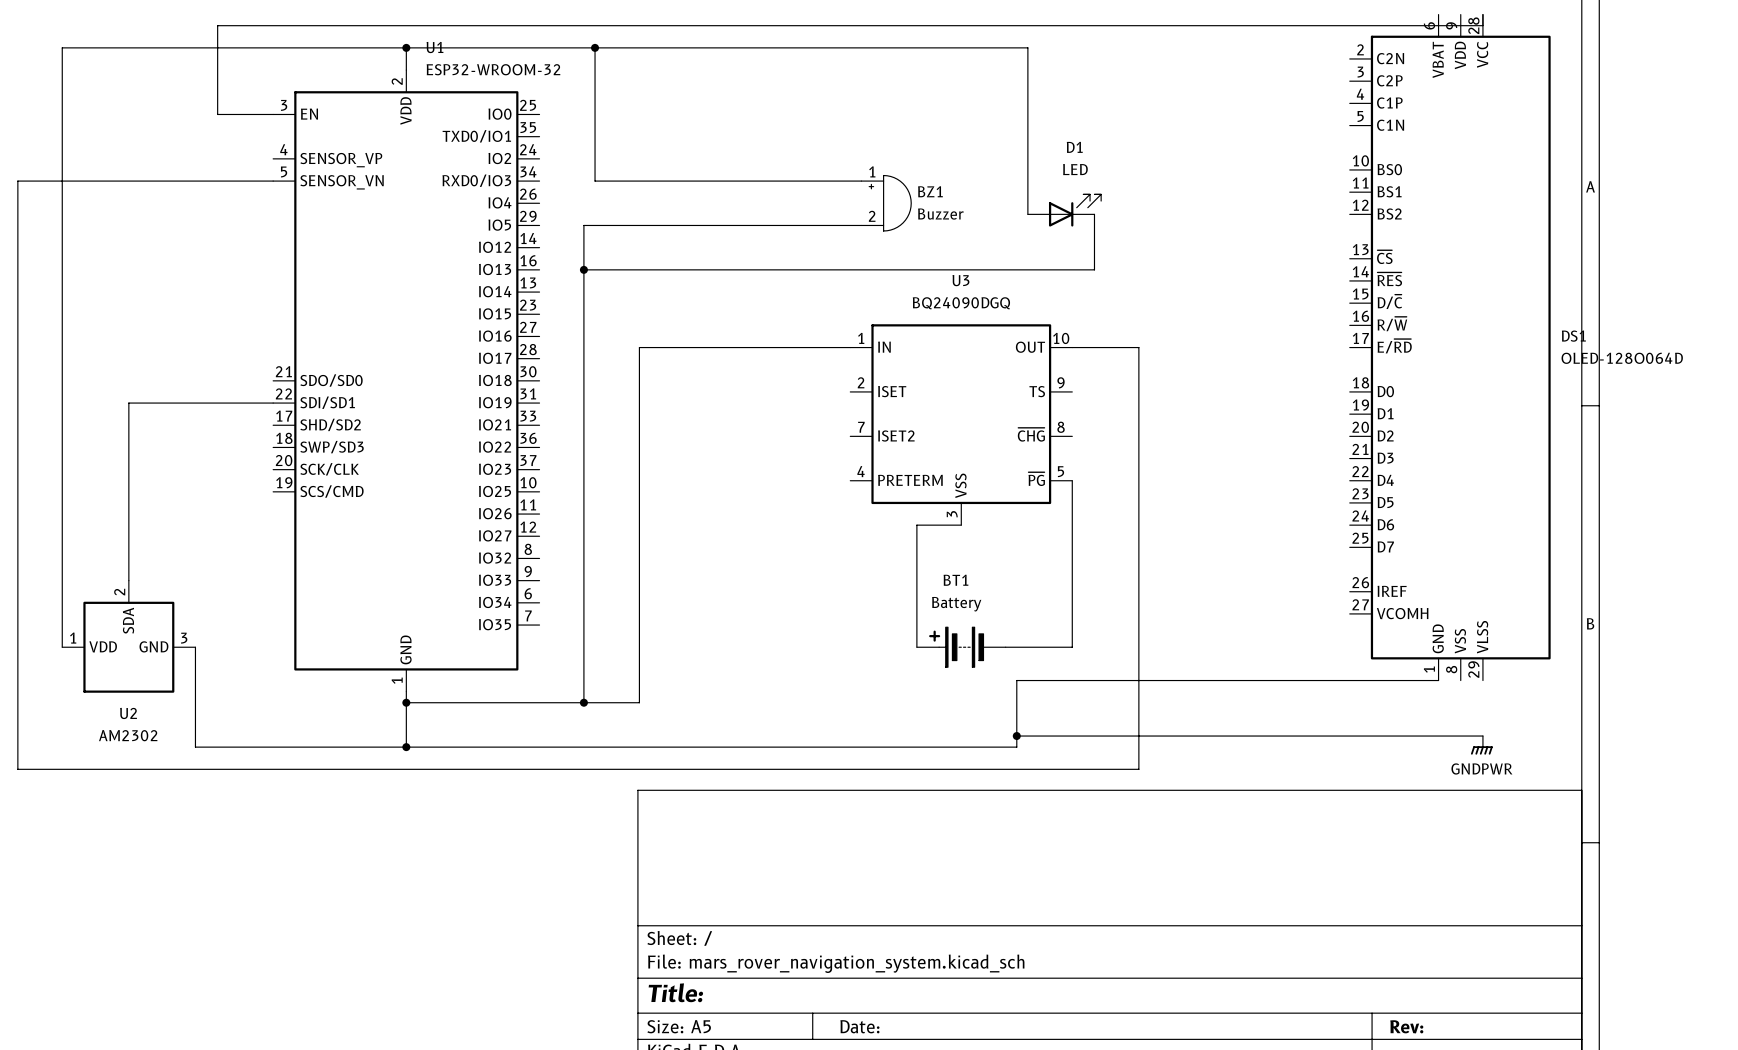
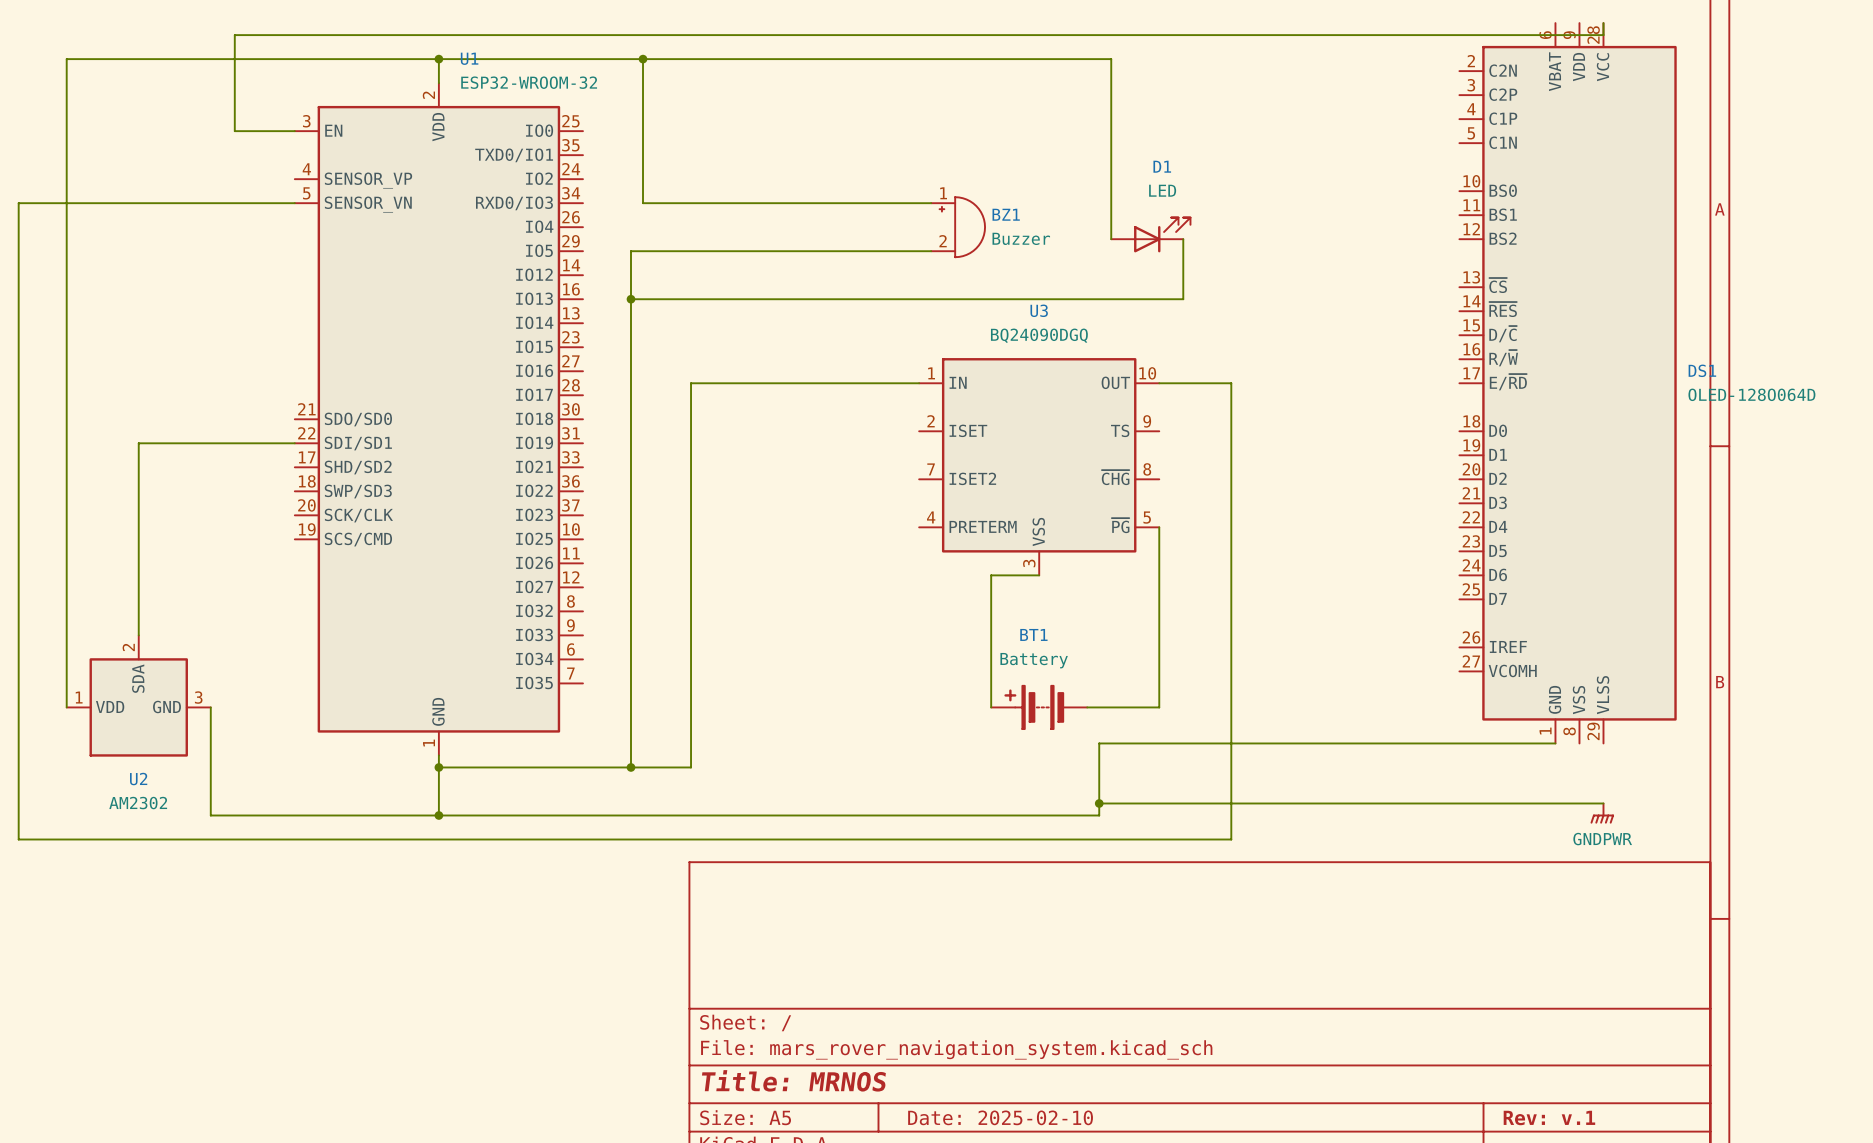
title block: Title: (675, 992) -> Title: MRNOS (793, 1080)
title block: Date: (859, 1026) -> Date: 2025-02-10 (1000, 1117)
title block: Rev: (1406, 1026) -> Rev: v.1 (1549, 1117)

